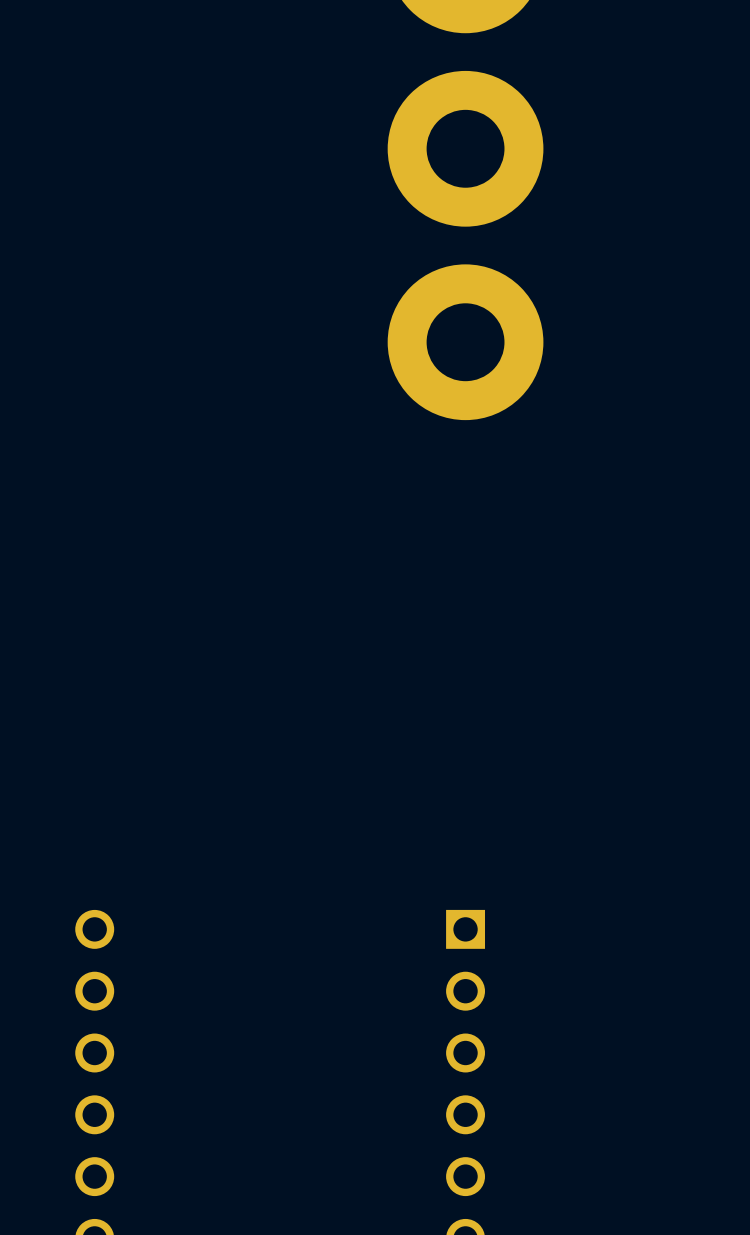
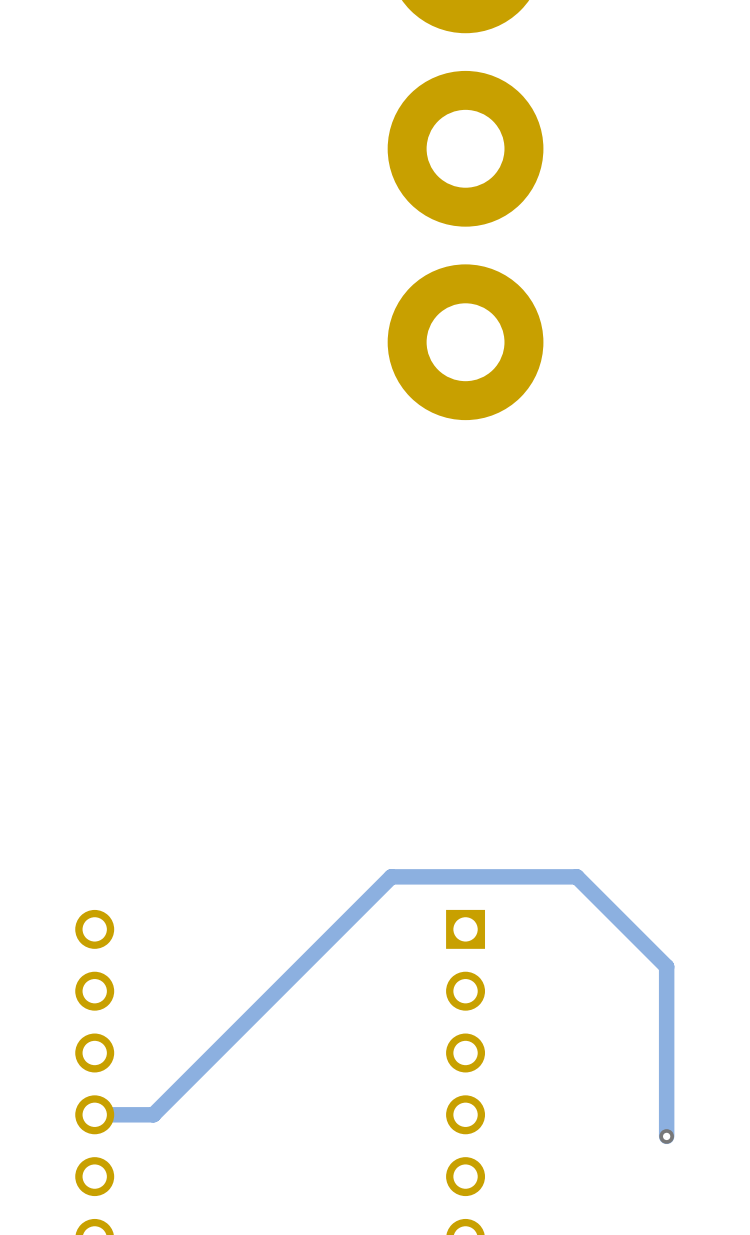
track: none -> (94, 1114) (153, 1114) (391, 876) (576, 876) (666, 966) (666, 1136)
via: none -> (666, 1136)

